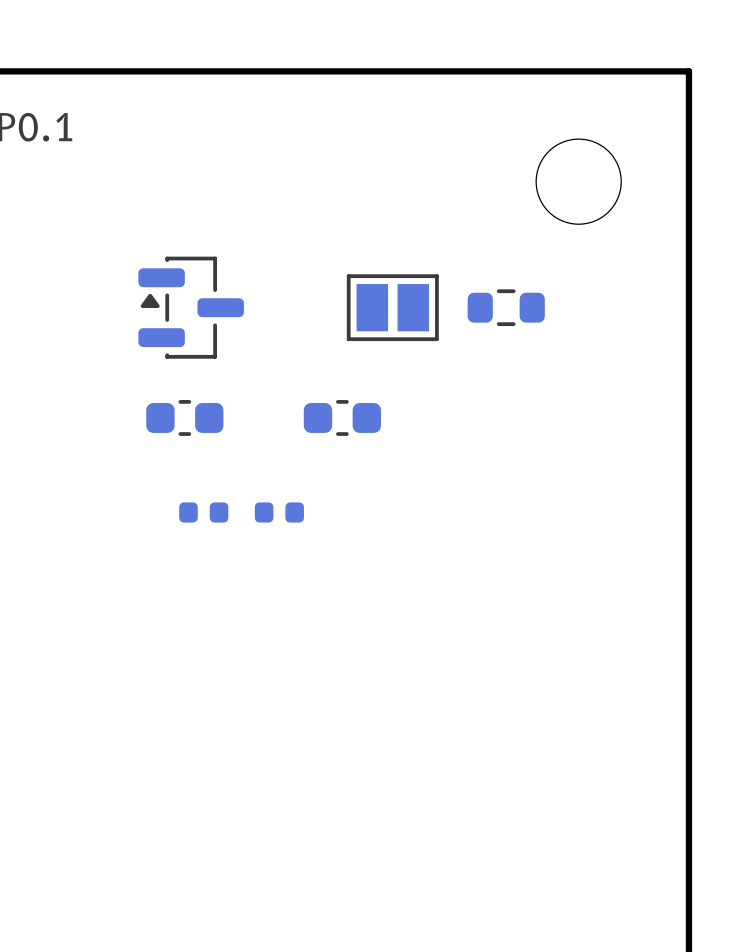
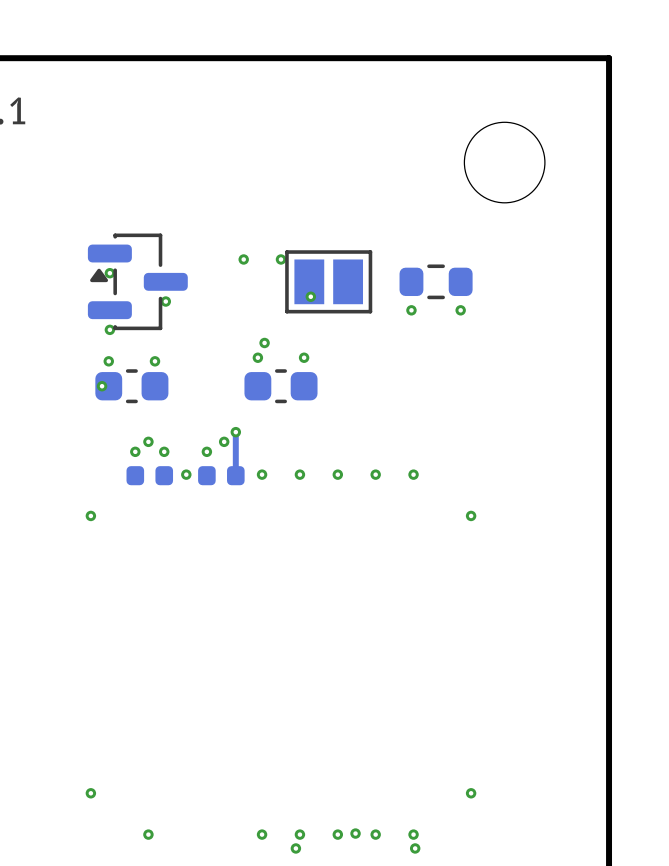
via: none -> (243, 259)
via: none -> (280, 259)
via: none -> (109, 273)
via: none -> (310, 296)
via: none -> (165, 301)
via: none -> (411, 310)
via: none -> (460, 310)
via: none -> (109, 329)
via: none -> (264, 342)
via: none -> (257, 357)
via: none -> (304, 357)
via: none -> (108, 361)
via: none -> (154, 361)
via: none -> (102, 386)
track: none -> (235, 432) (235, 475)
via: none -> (235, 432)
via: none -> (148, 441)
via: none -> (224, 441)
via: none -> (135, 451)
via: none -> (164, 451)
via: none -> (206, 451)
via: none -> (186, 474)
via: none -> (262, 474)
via: none -> (299, 474)
via: none -> (337, 474)
via: none -> (375, 474)
via: none -> (413, 474)
via: none -> (90, 515)
via: none -> (471, 515)
via: none -> (90, 793)
via: none -> (471, 793)
via: none -> (355, 833)
via: none -> (148, 834)
via: none -> (262, 834)
via: none -> (299, 834)
via: none -> (337, 834)
via: none -> (375, 834)
via: none -> (413, 834)
via: none -> (295, 848)
via: none -> (415, 848)

